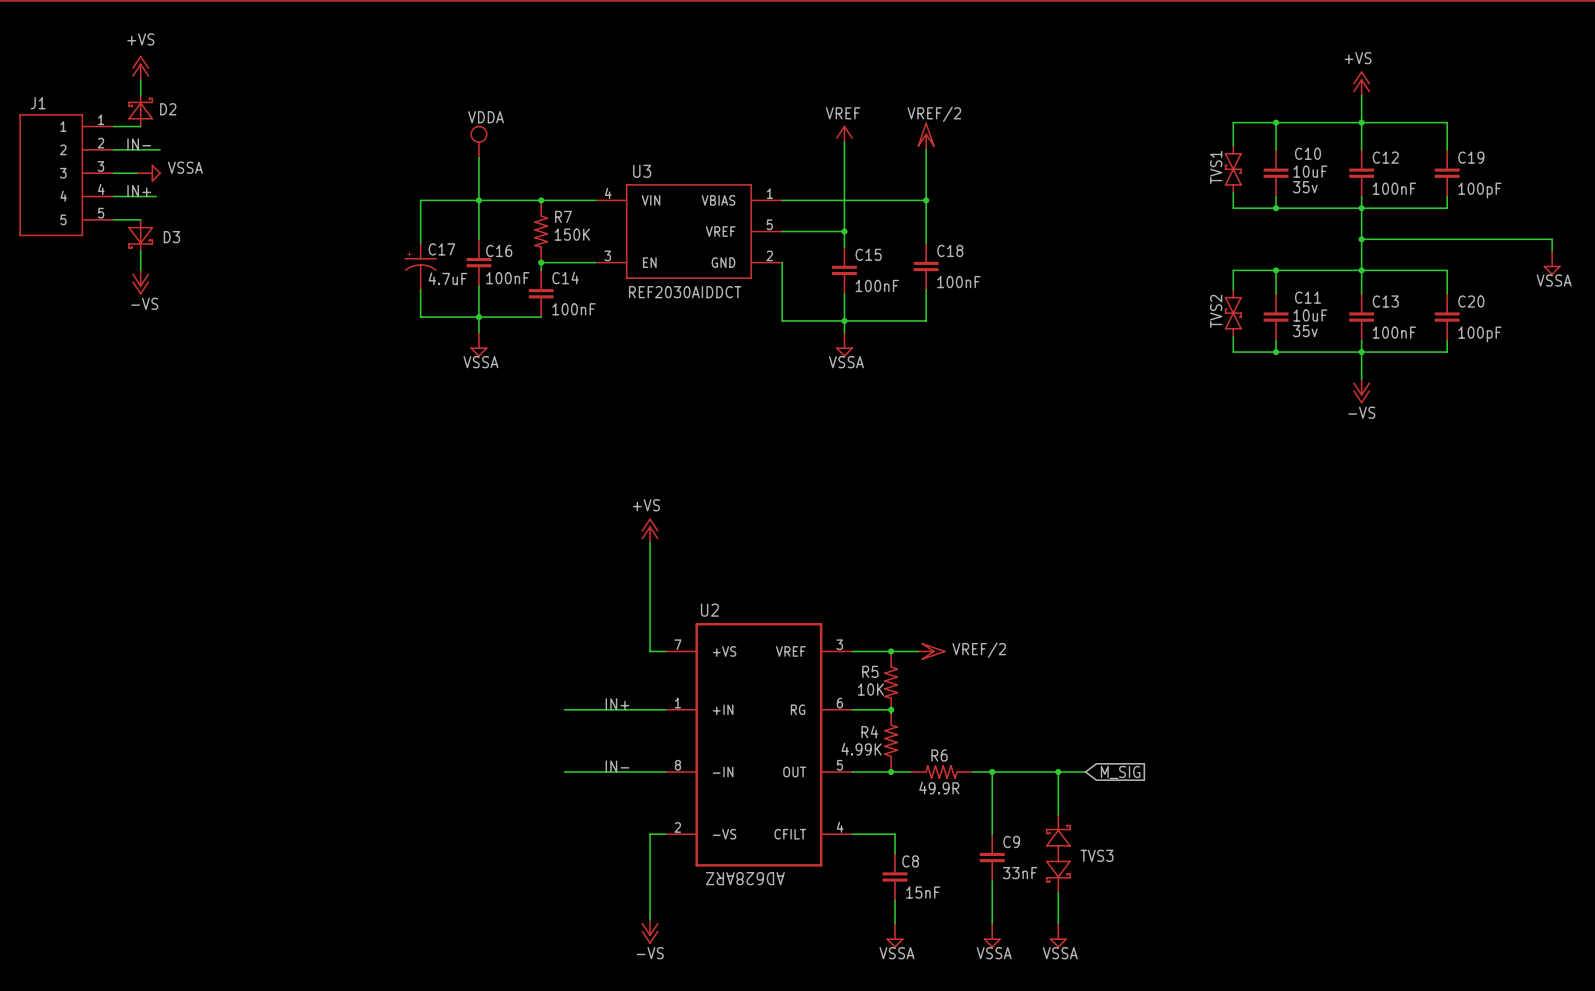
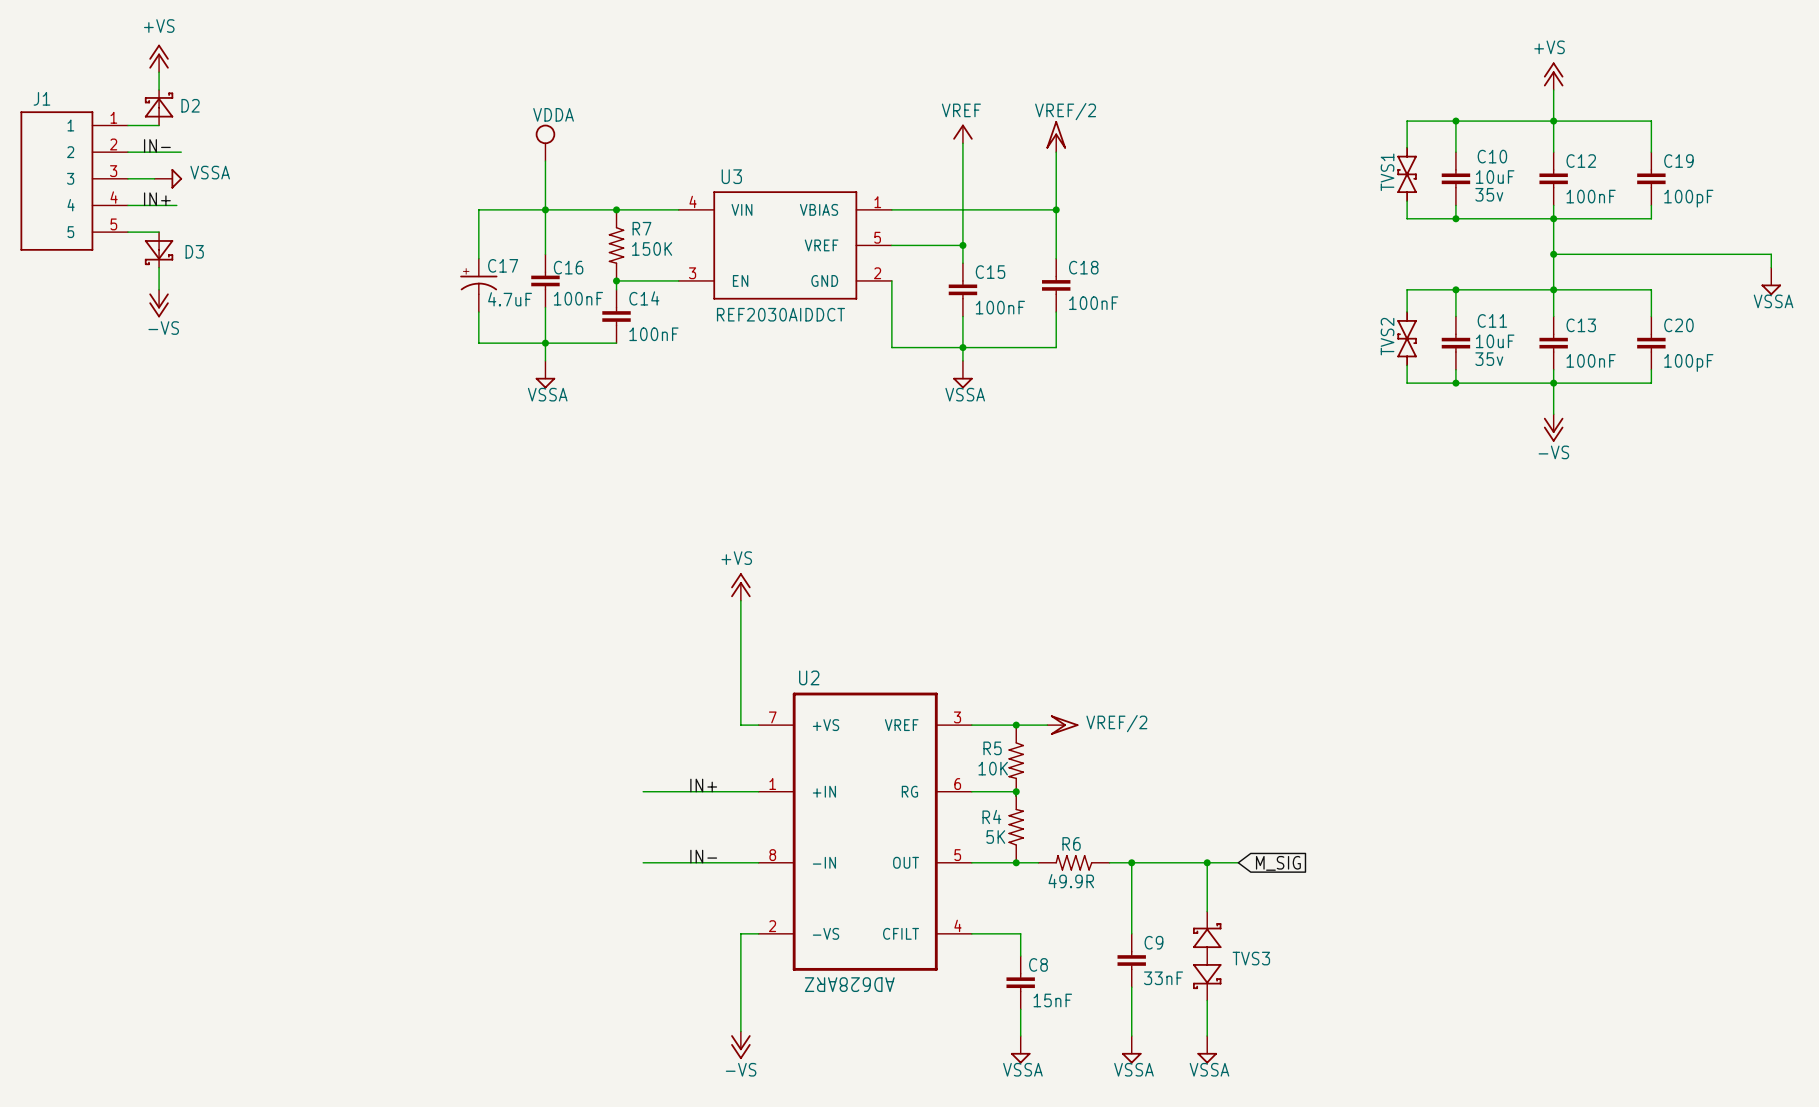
R4 value: 4.99K (861, 749) -> 5K (995, 837)

